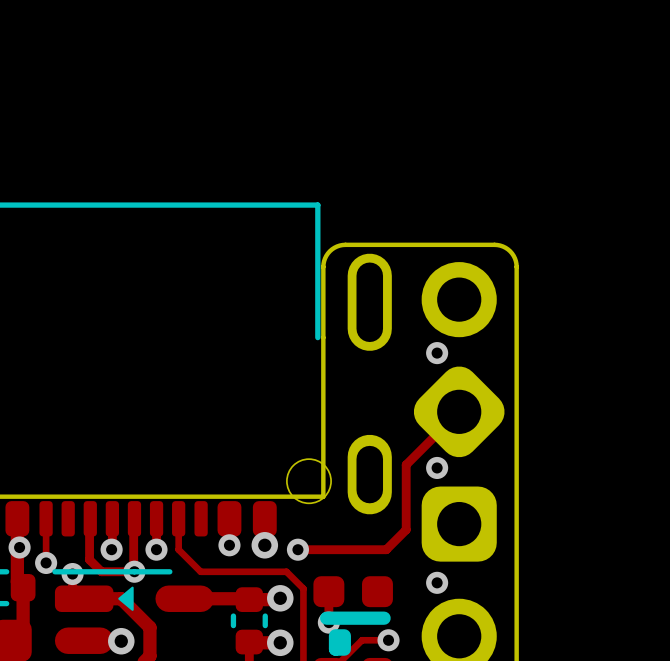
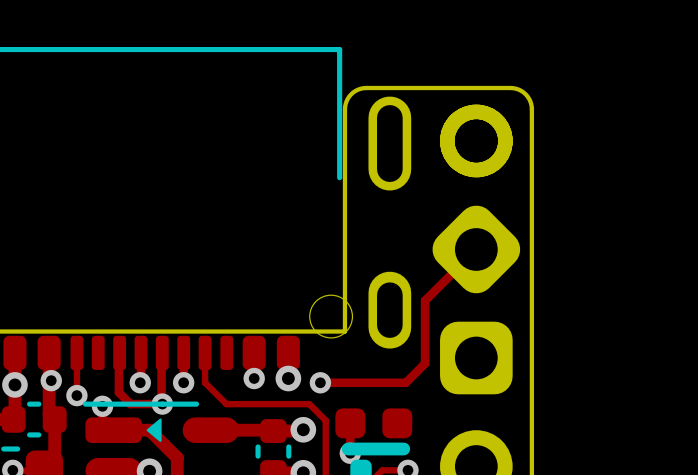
part: none -> (476, 140)
via: (437, 353) -> none
via: (437, 467) -> none
via: (437, 582) -> none

